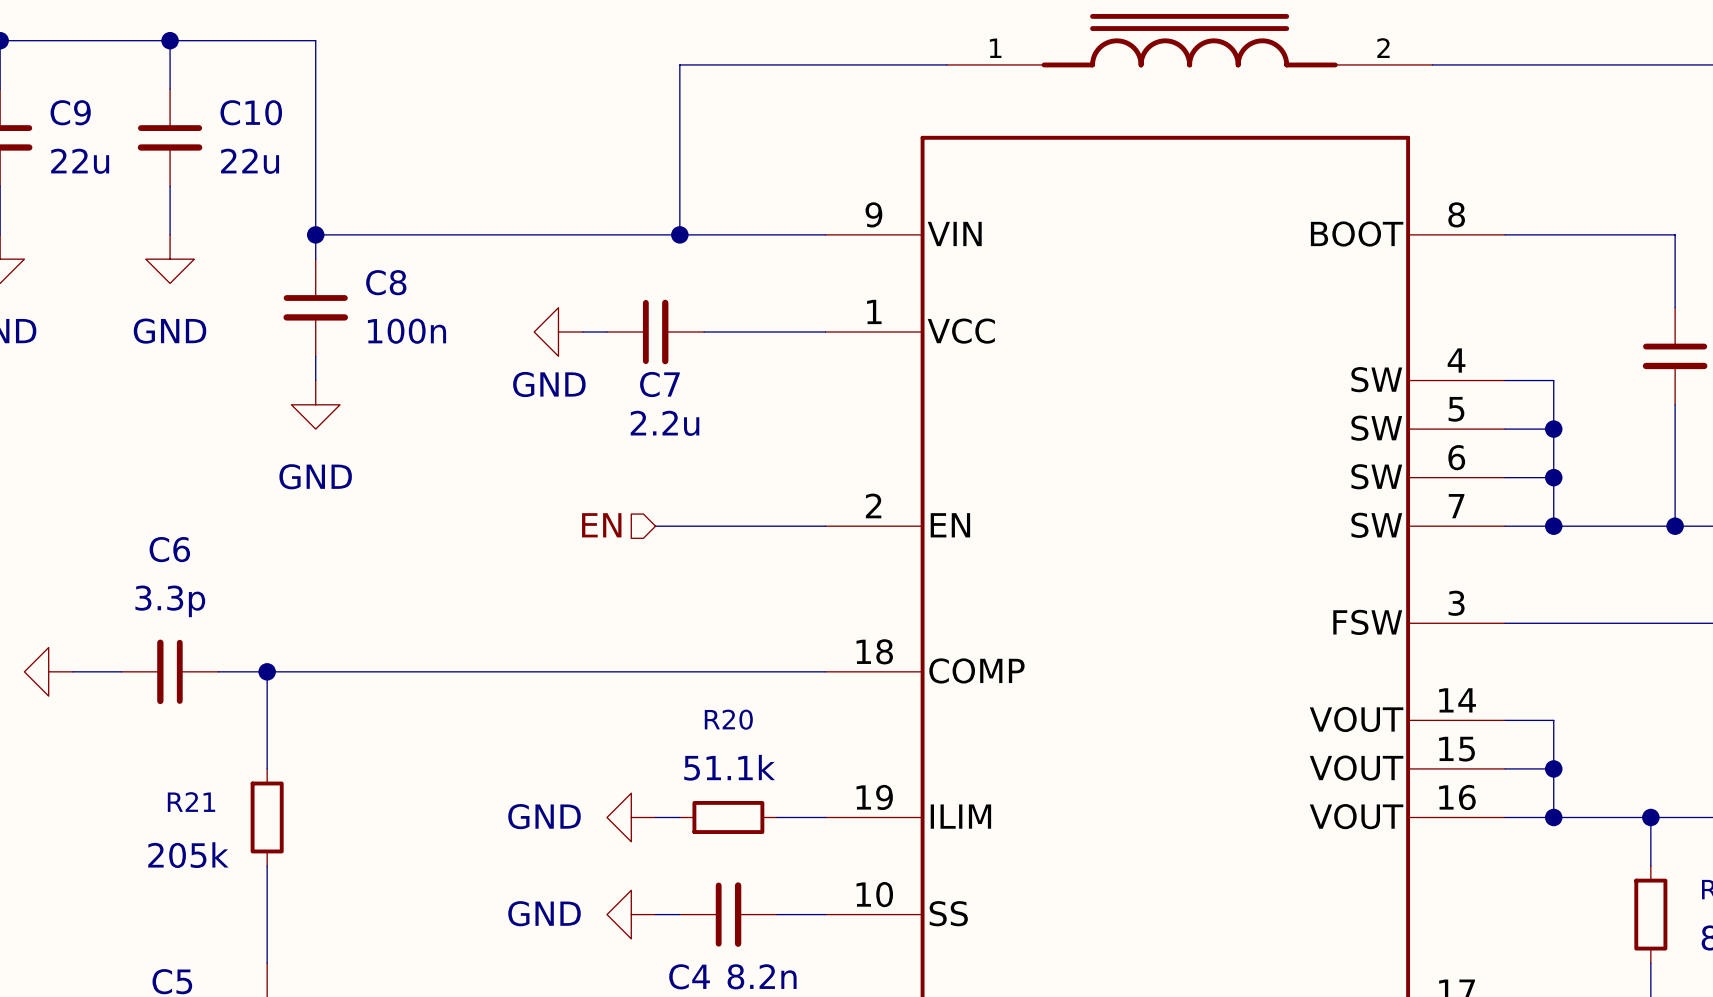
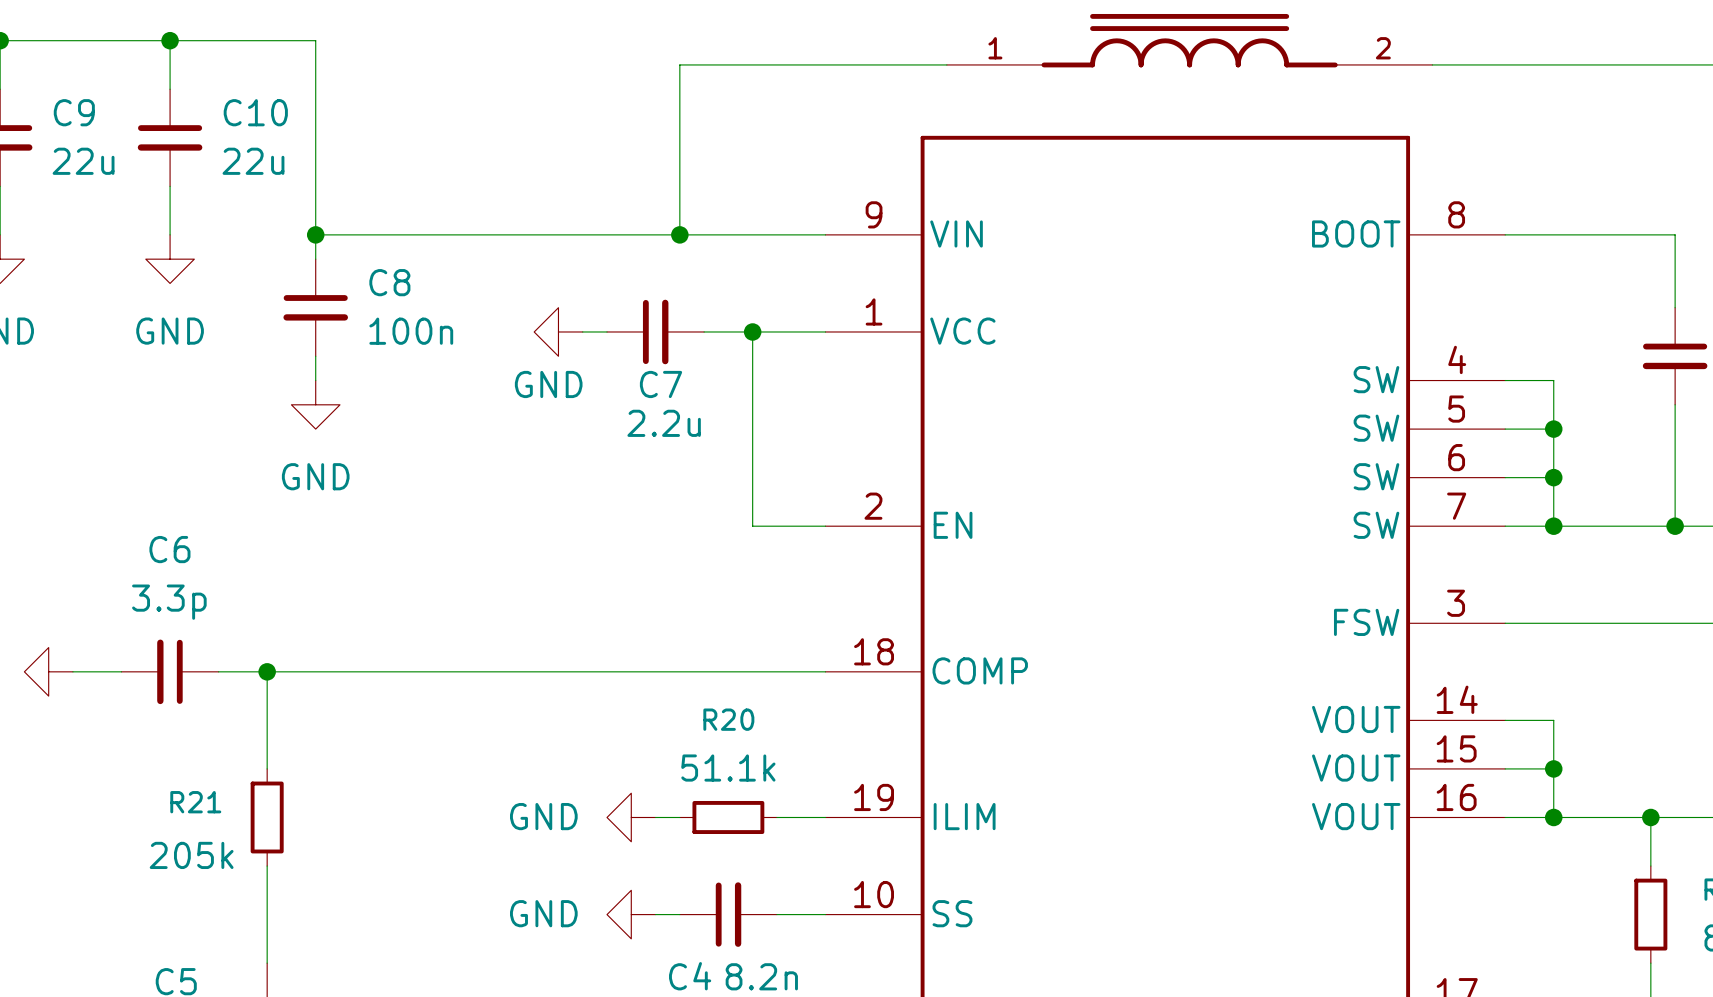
junction: none -> (752, 331)
hierarchical label: EN (601, 525) -> none
wire: (655, 526) (752, 526) -> (752, 331) (752, 526)

